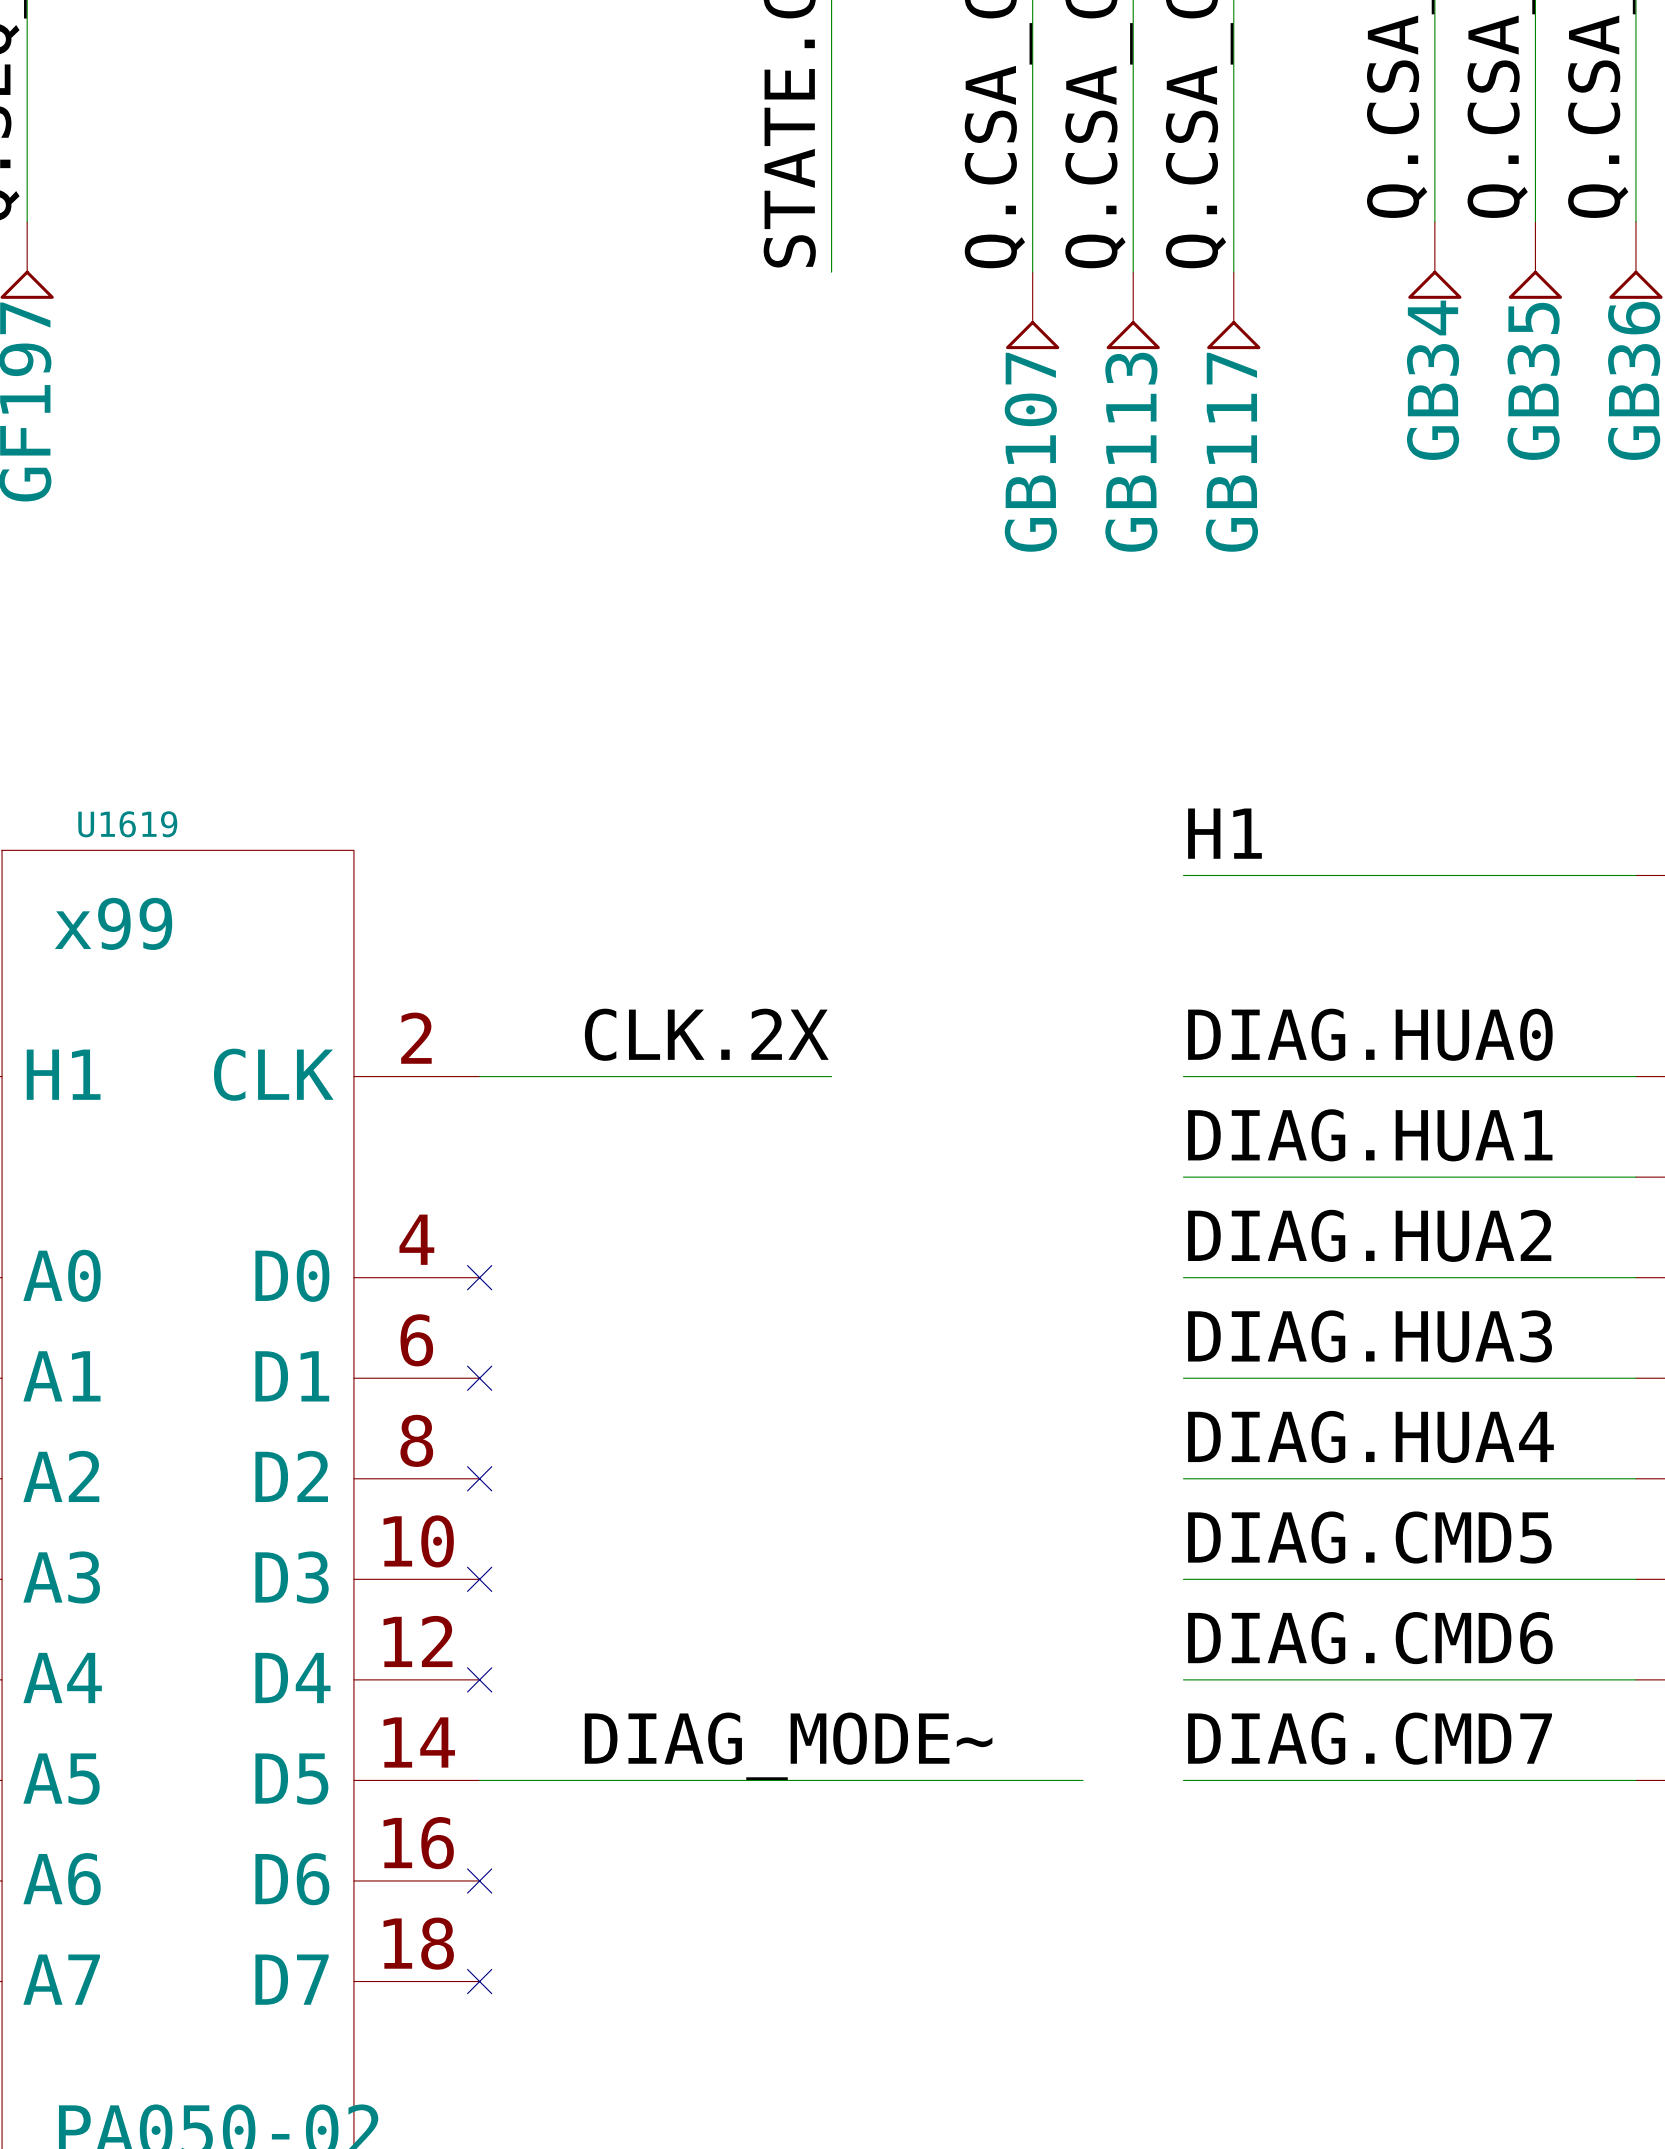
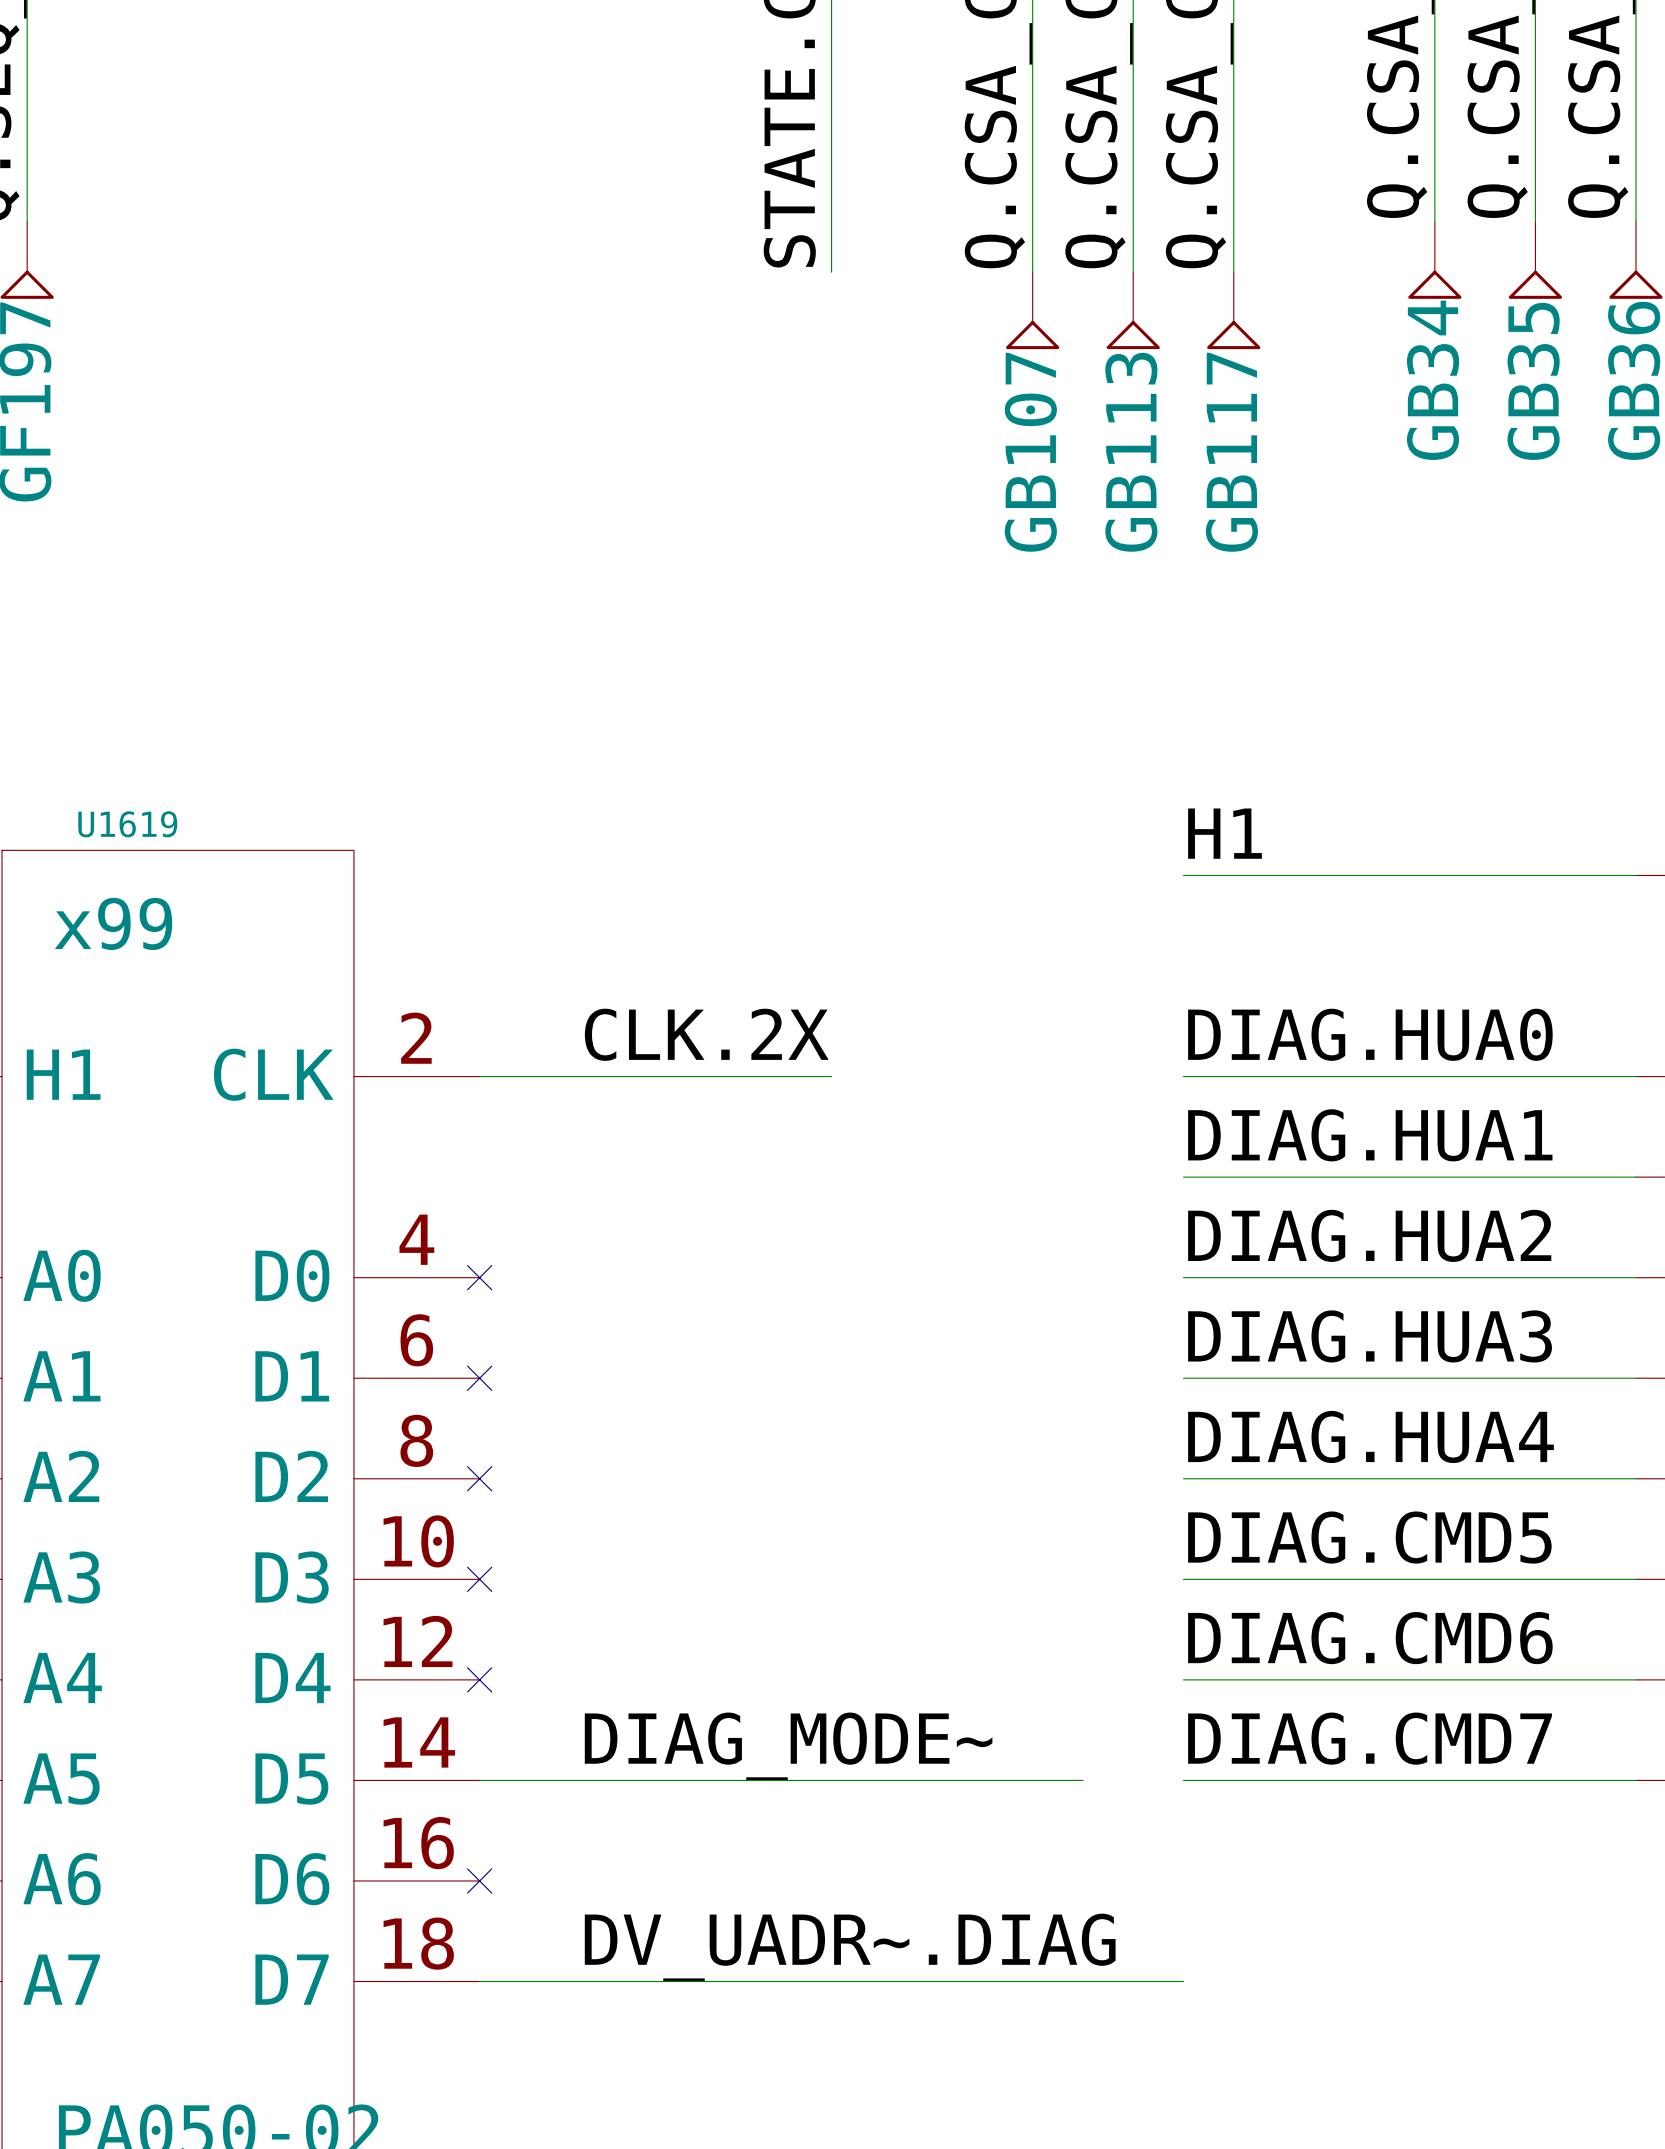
label: none -> DV_UADR~.DIAG (850, 1947)
wire: none -> (479, 1981) (1183, 1981)
no-connect mark: (479, 1981) -> none

